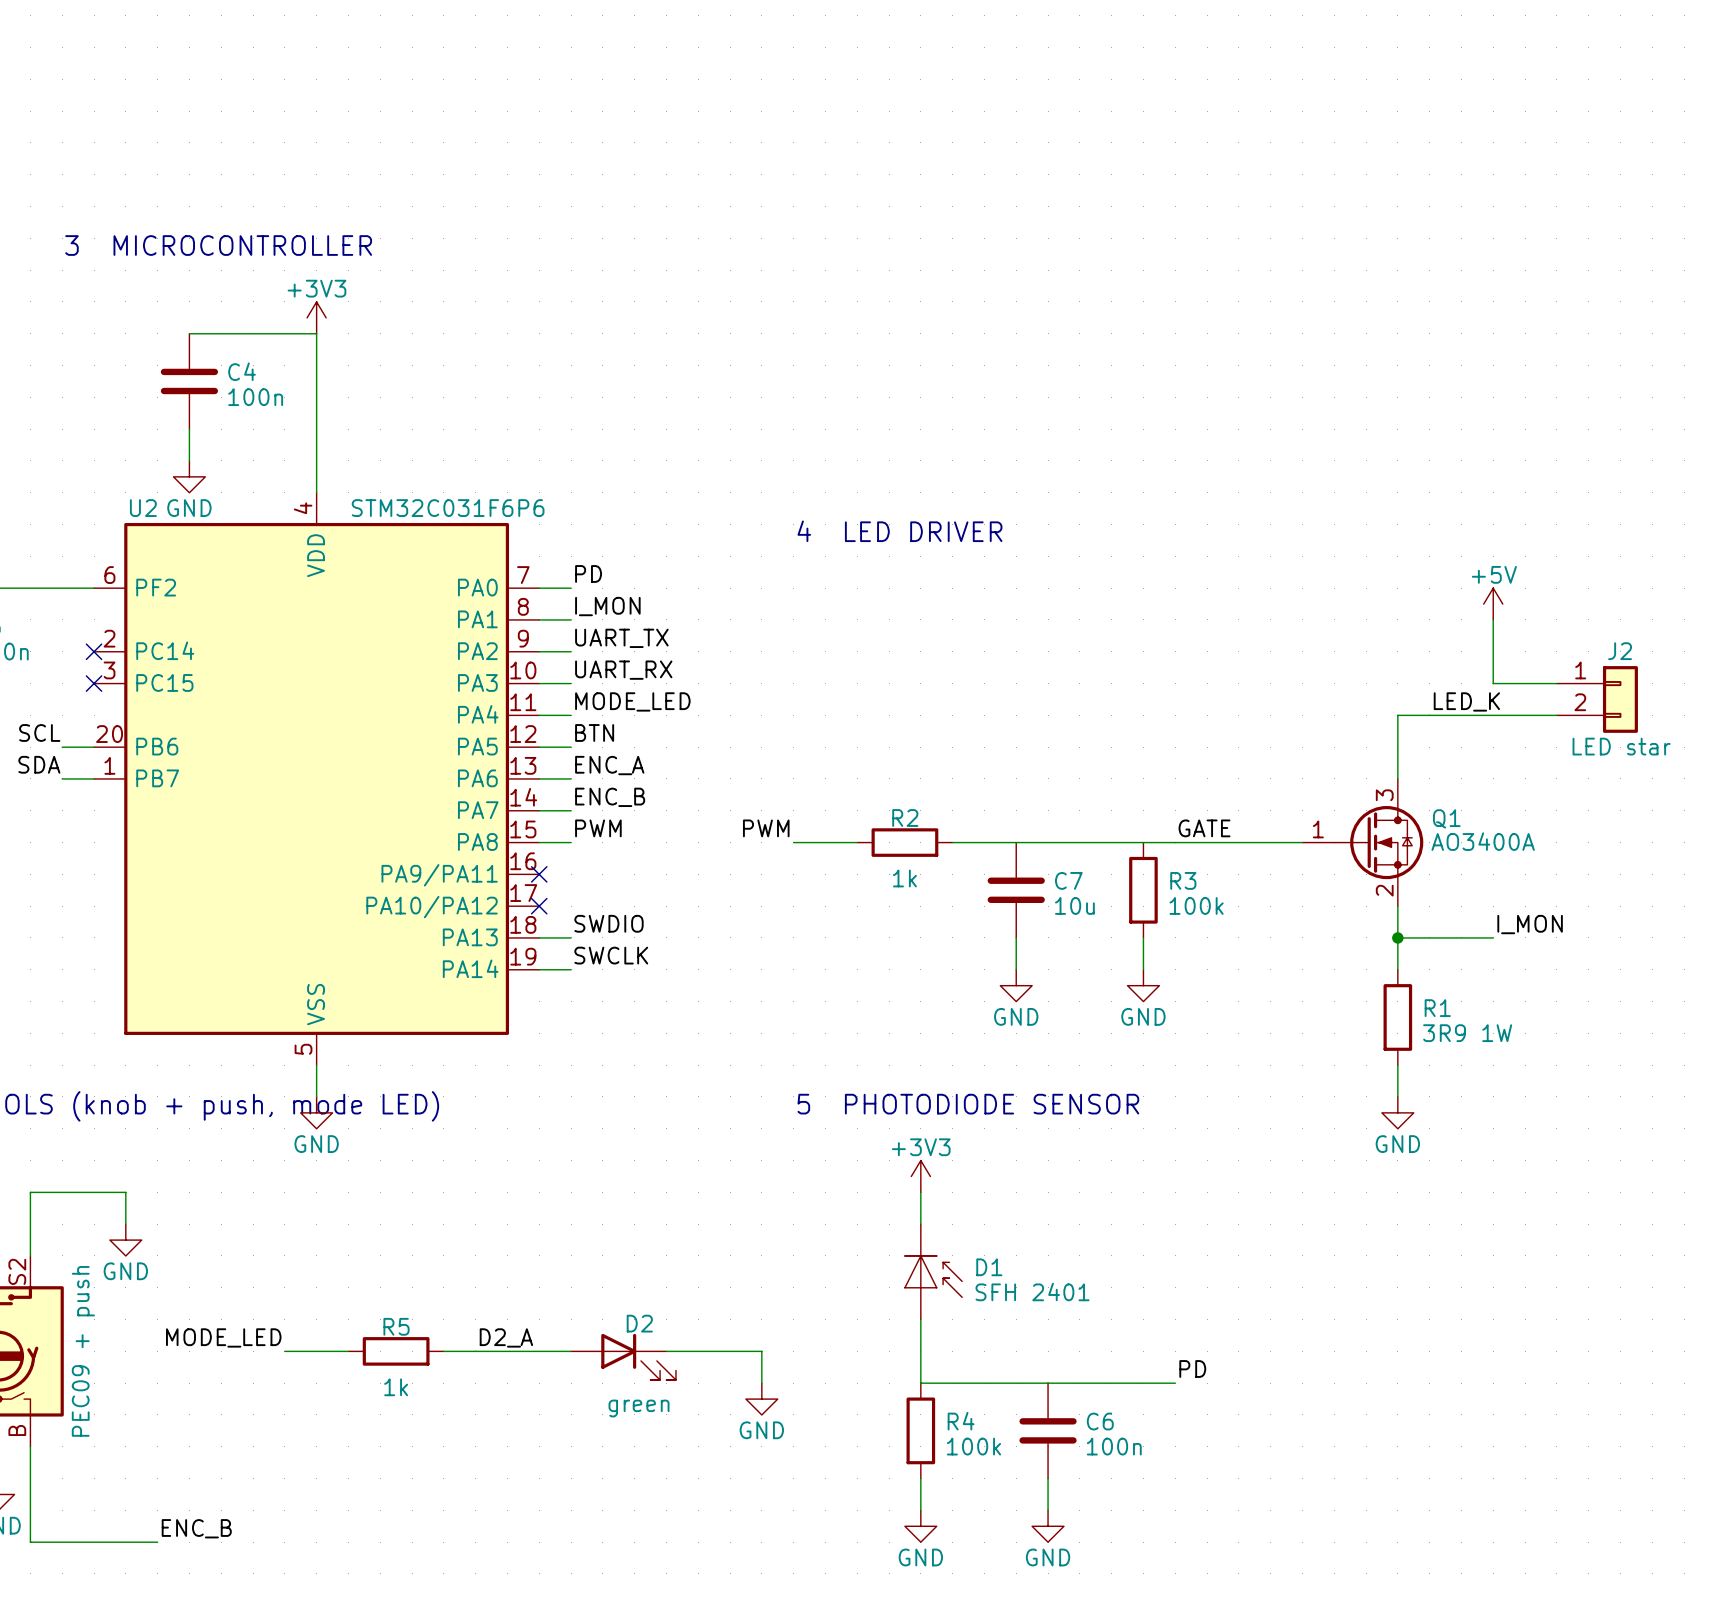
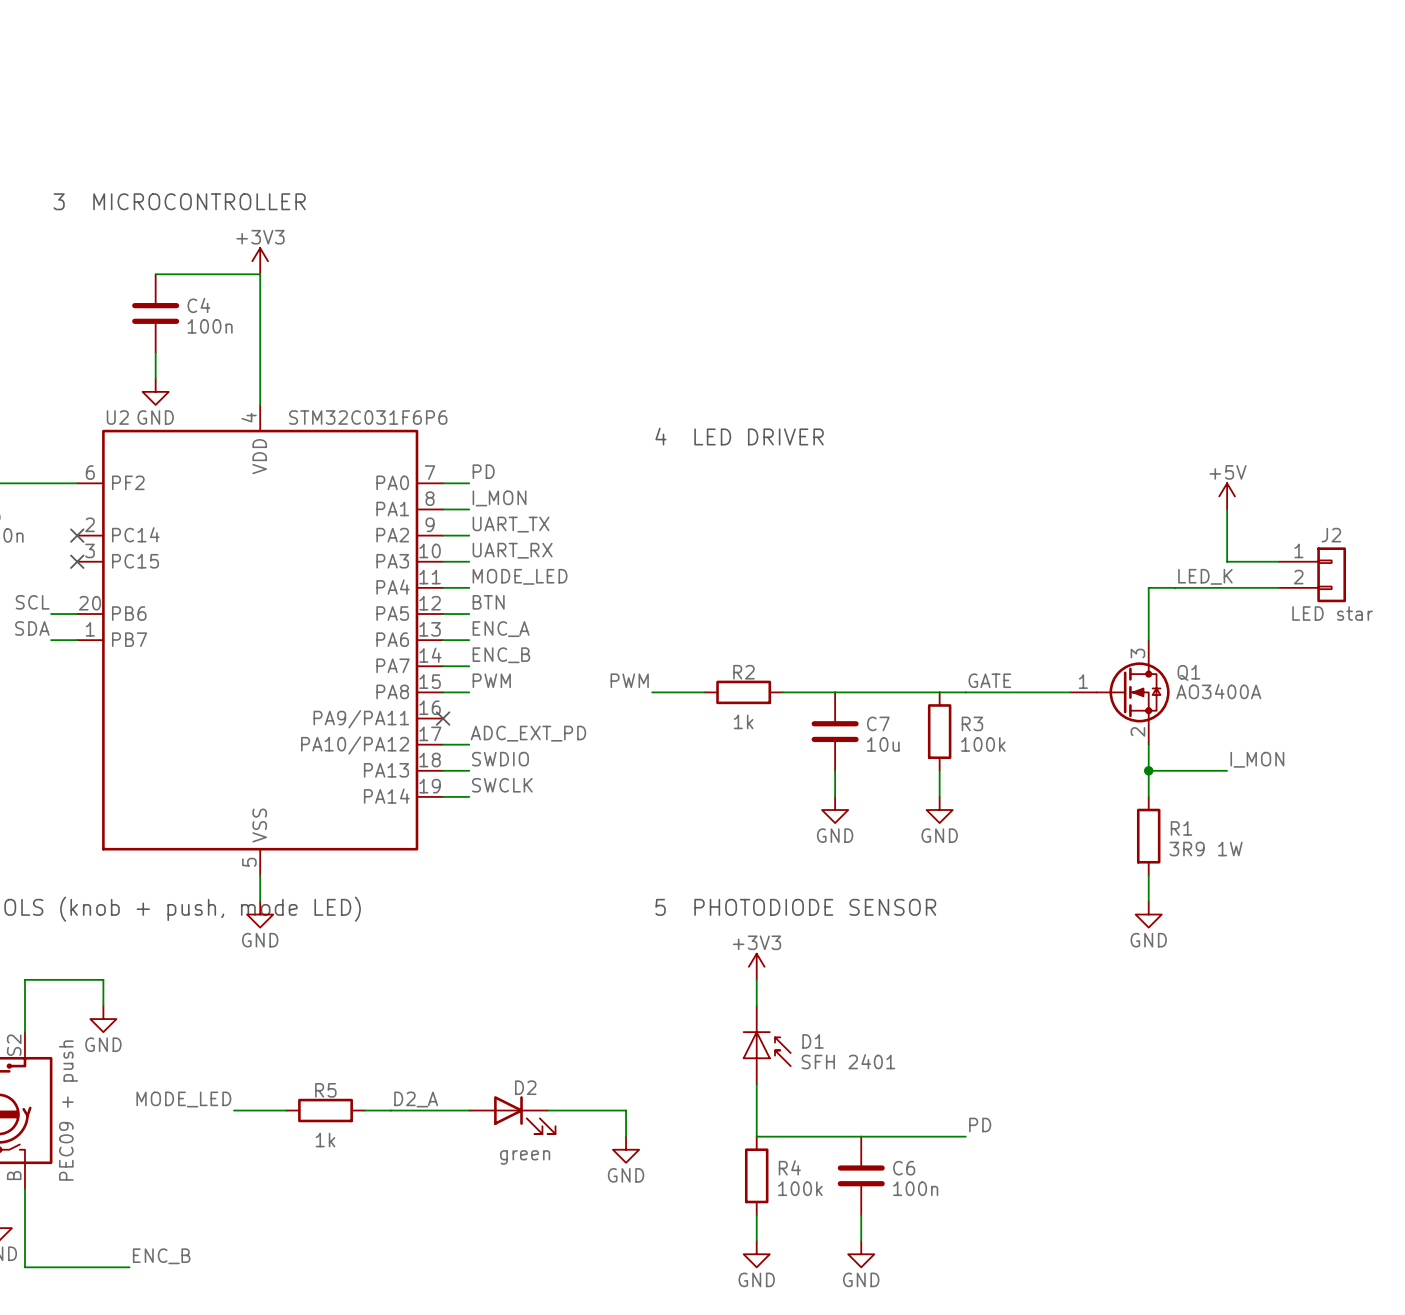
label: none -> ADC_EXT_PD (528, 733)
wire: none -> (443, 744) (469, 744)
no-connect mark: (539, 906) -> none

